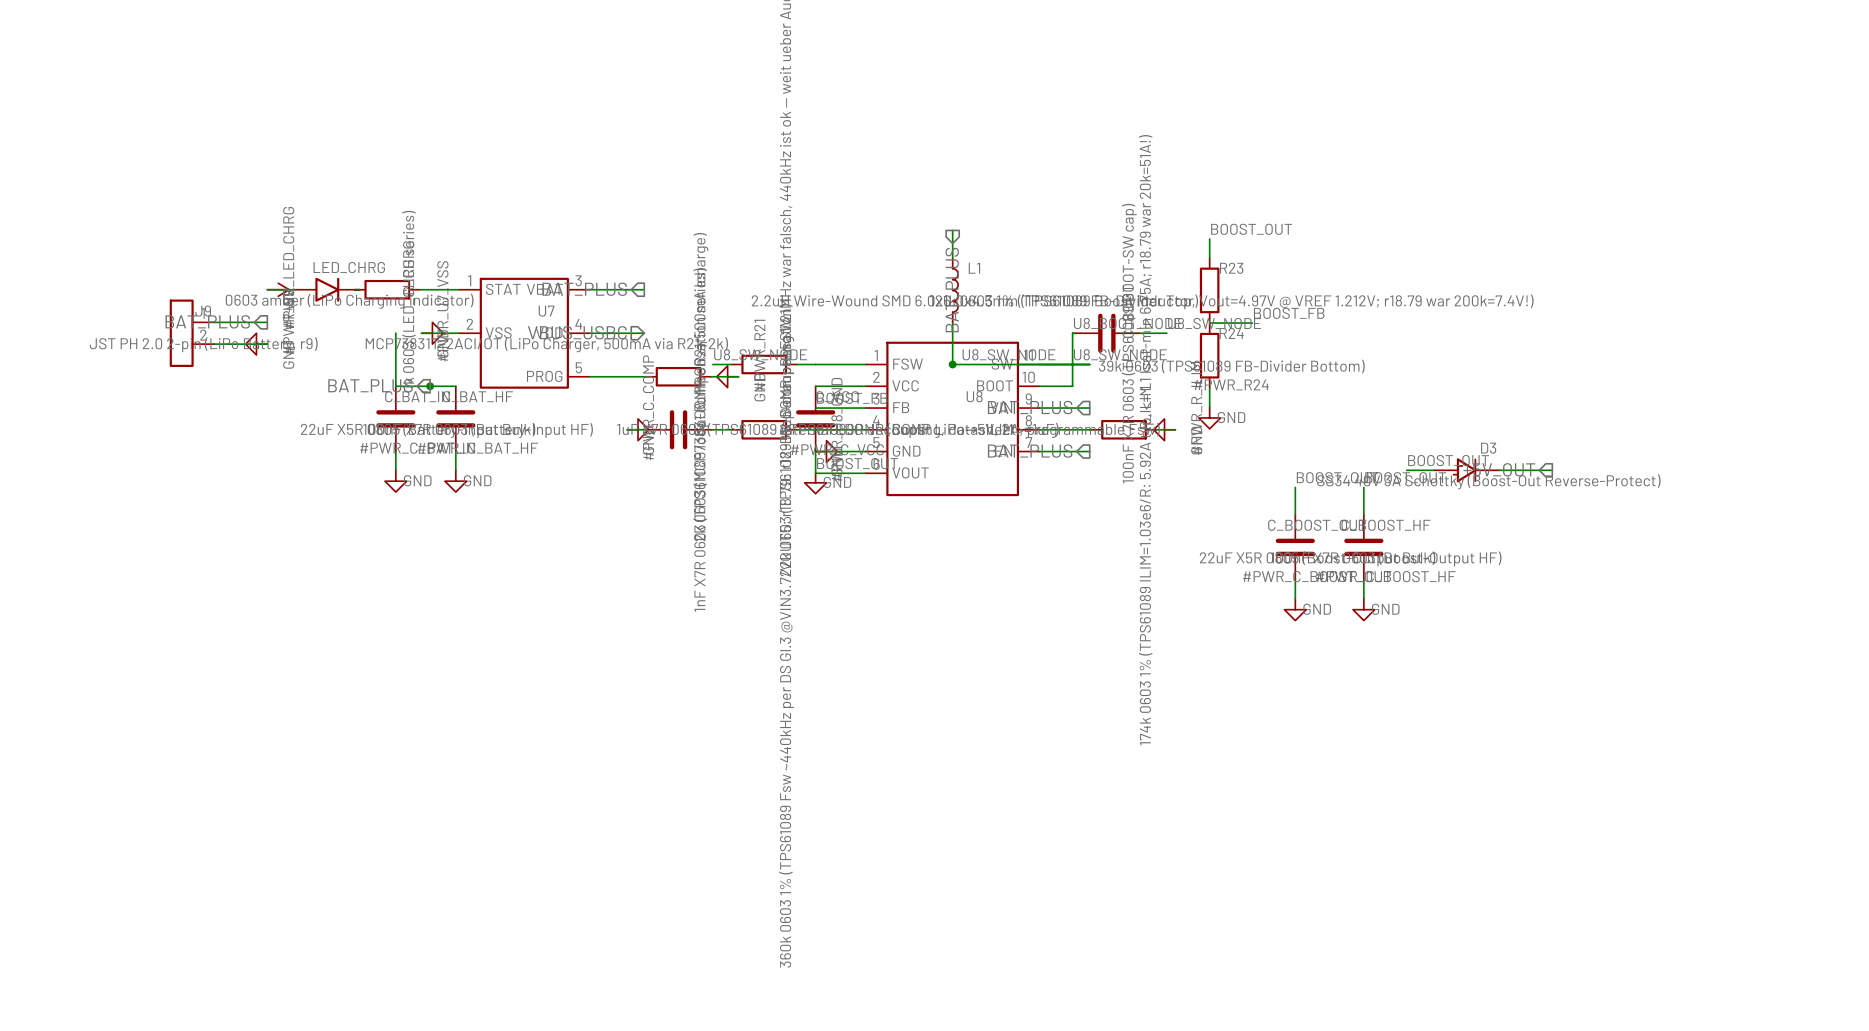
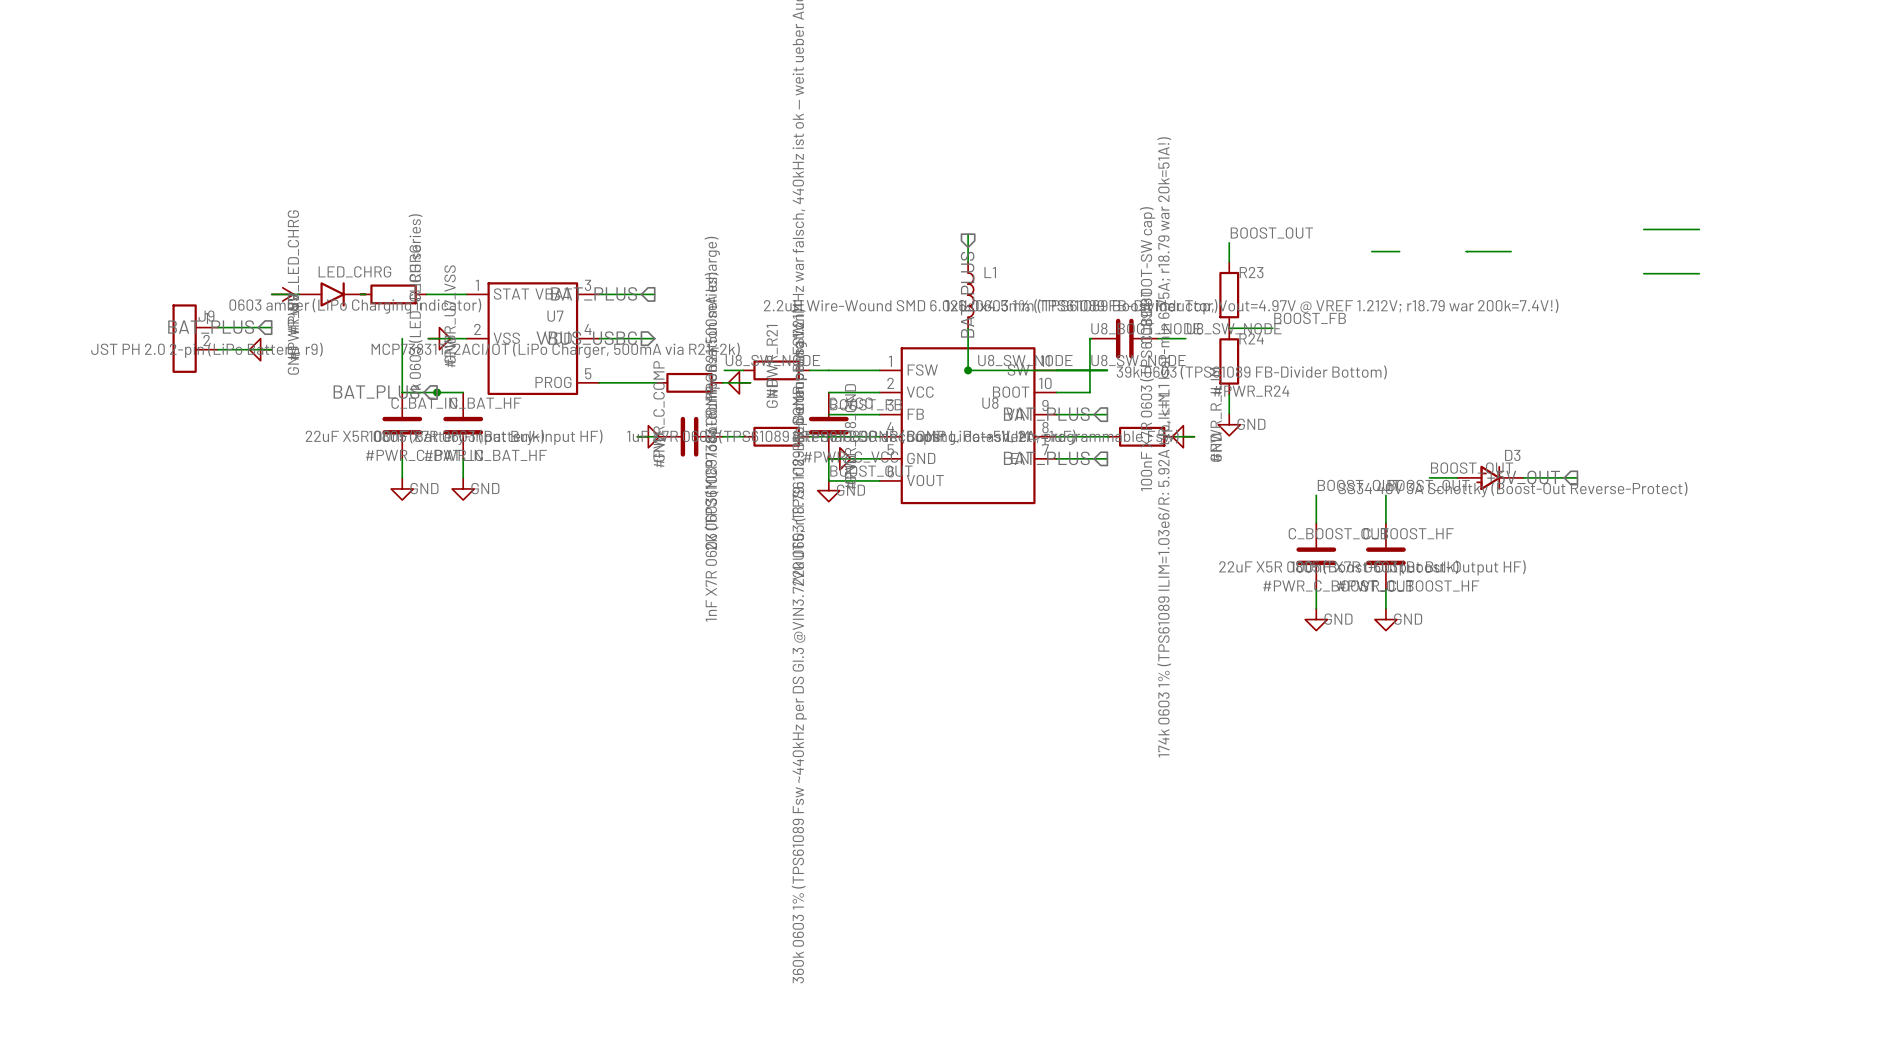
wire: none -> (1643, 229) (1699, 229)
wire: none -> (1371, 251) (1399, 251)
wire: none -> (1465, 251) (1511, 251)
wire: none -> (1643, 273) (1699, 273)

